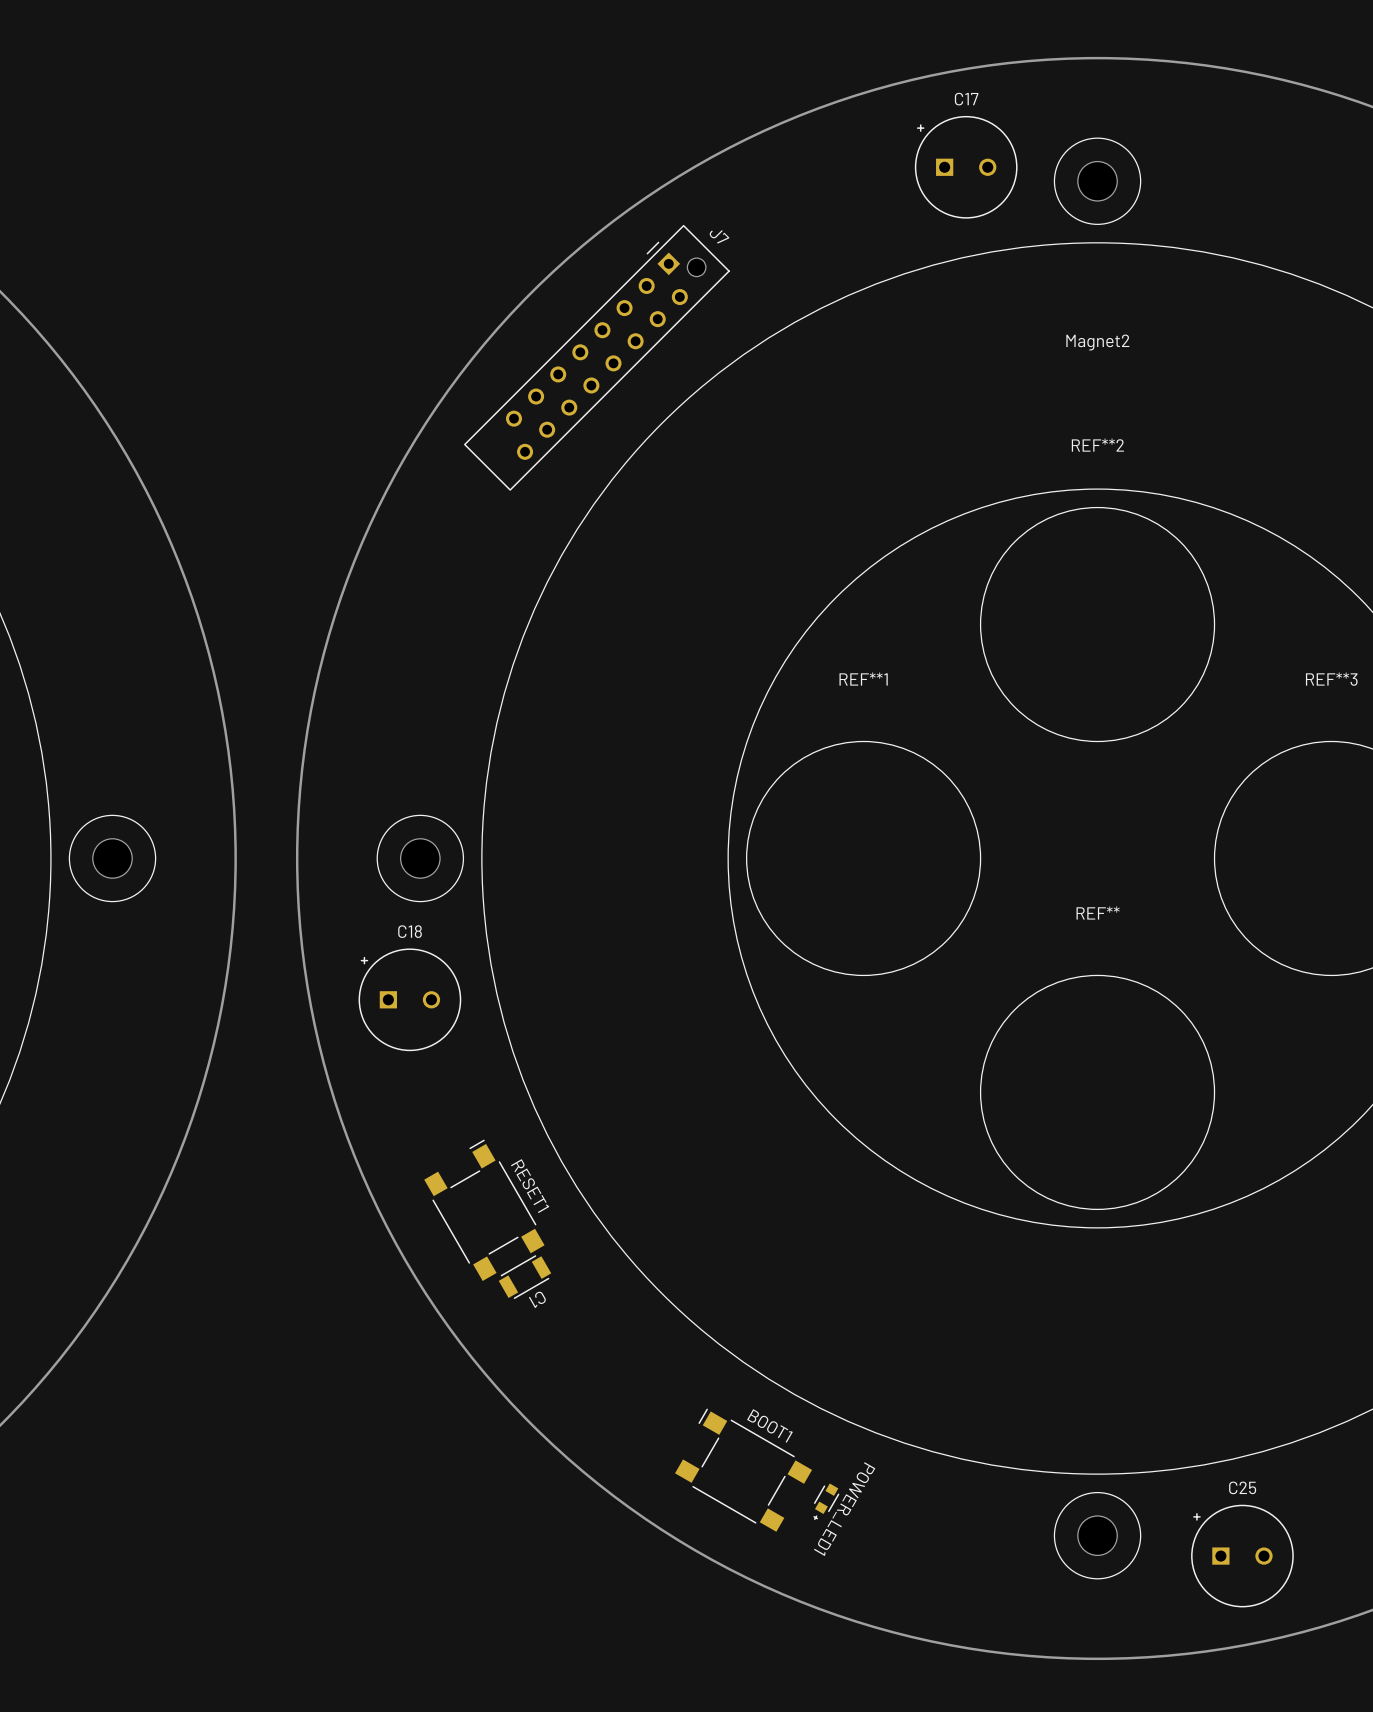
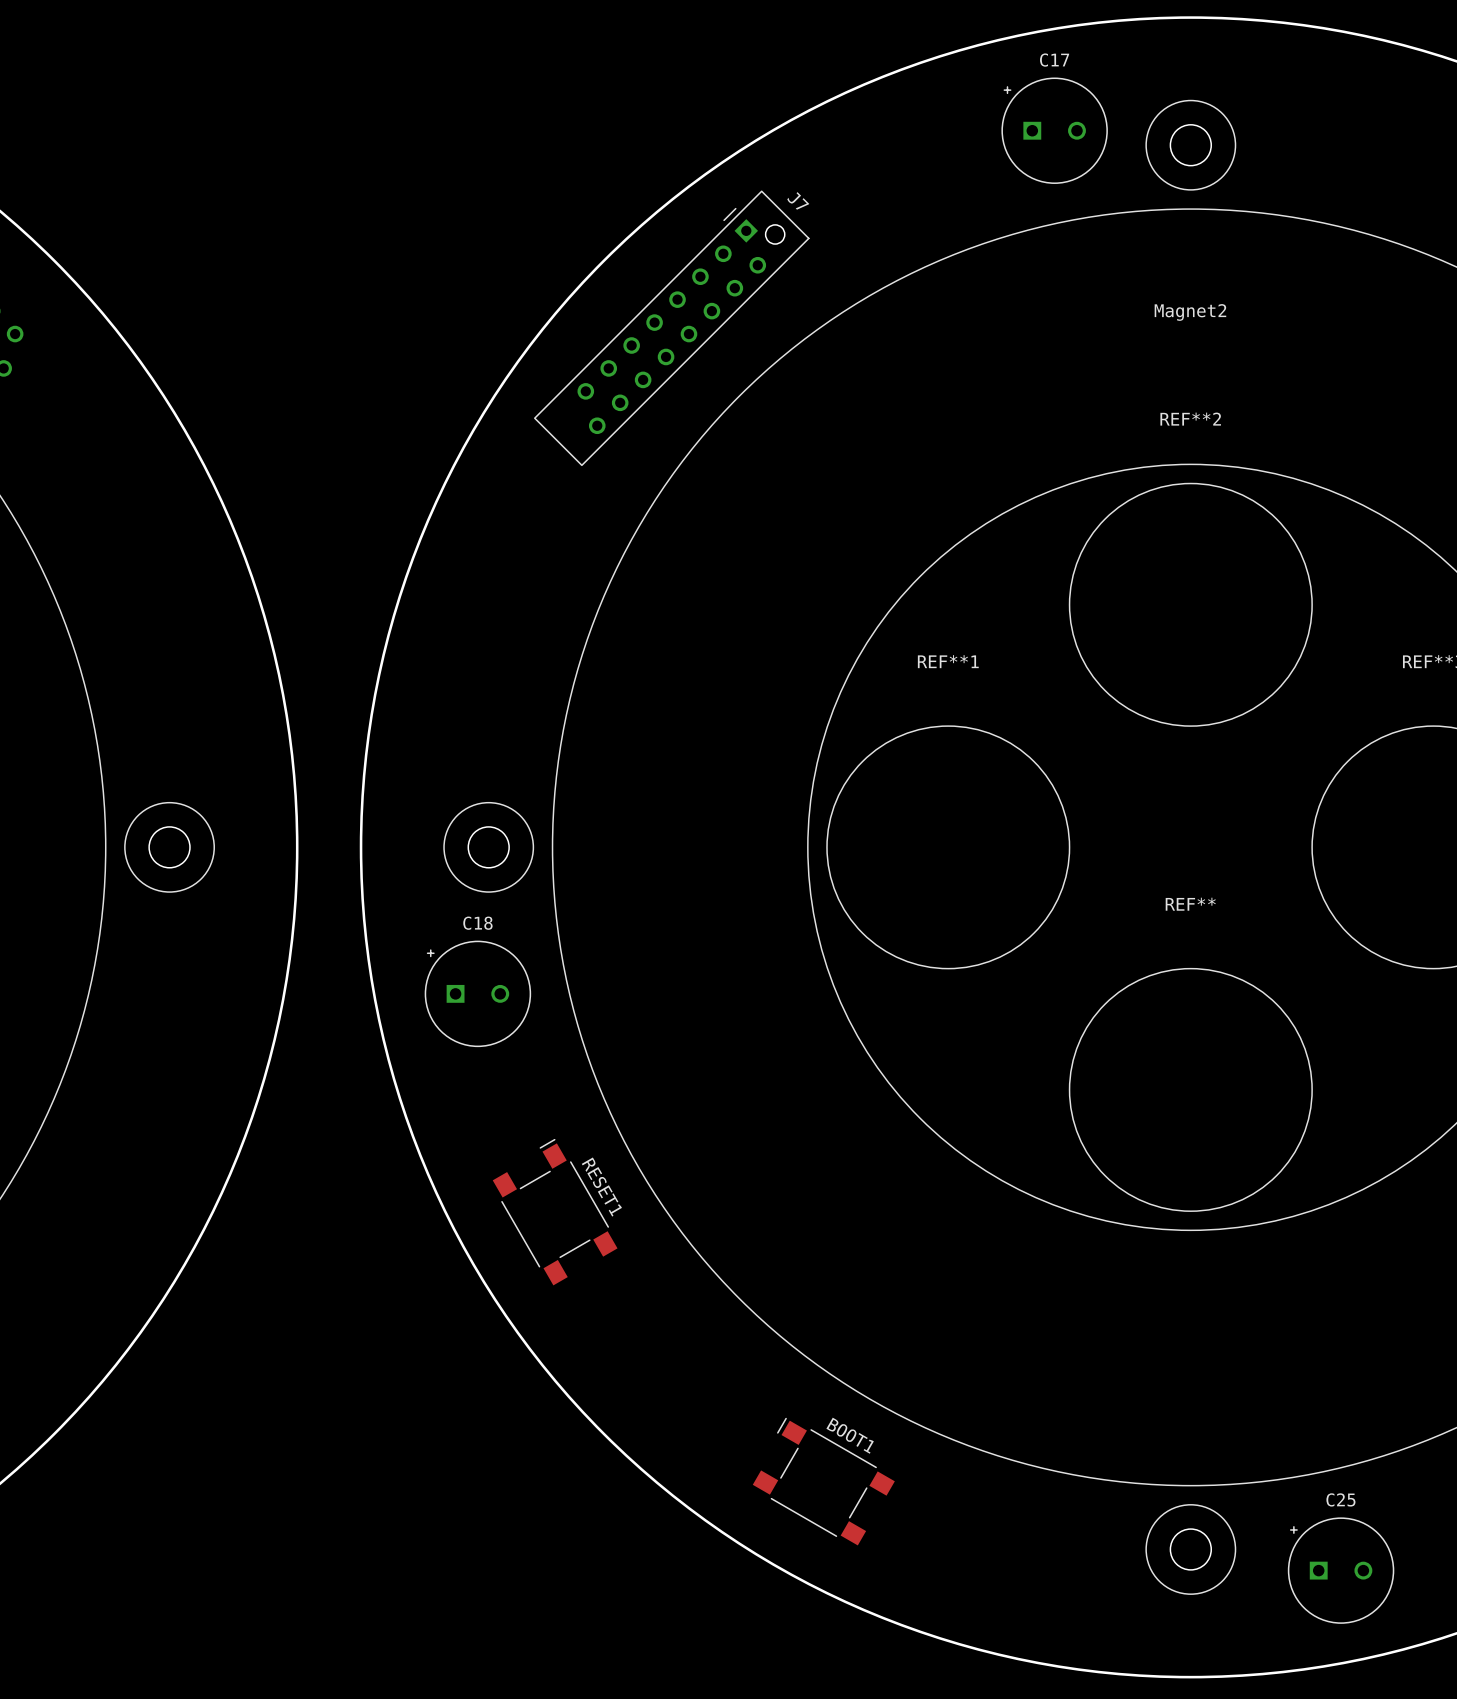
C1: (524, 1277) -> none
POWER_LED1: (826, 1501) -> none

